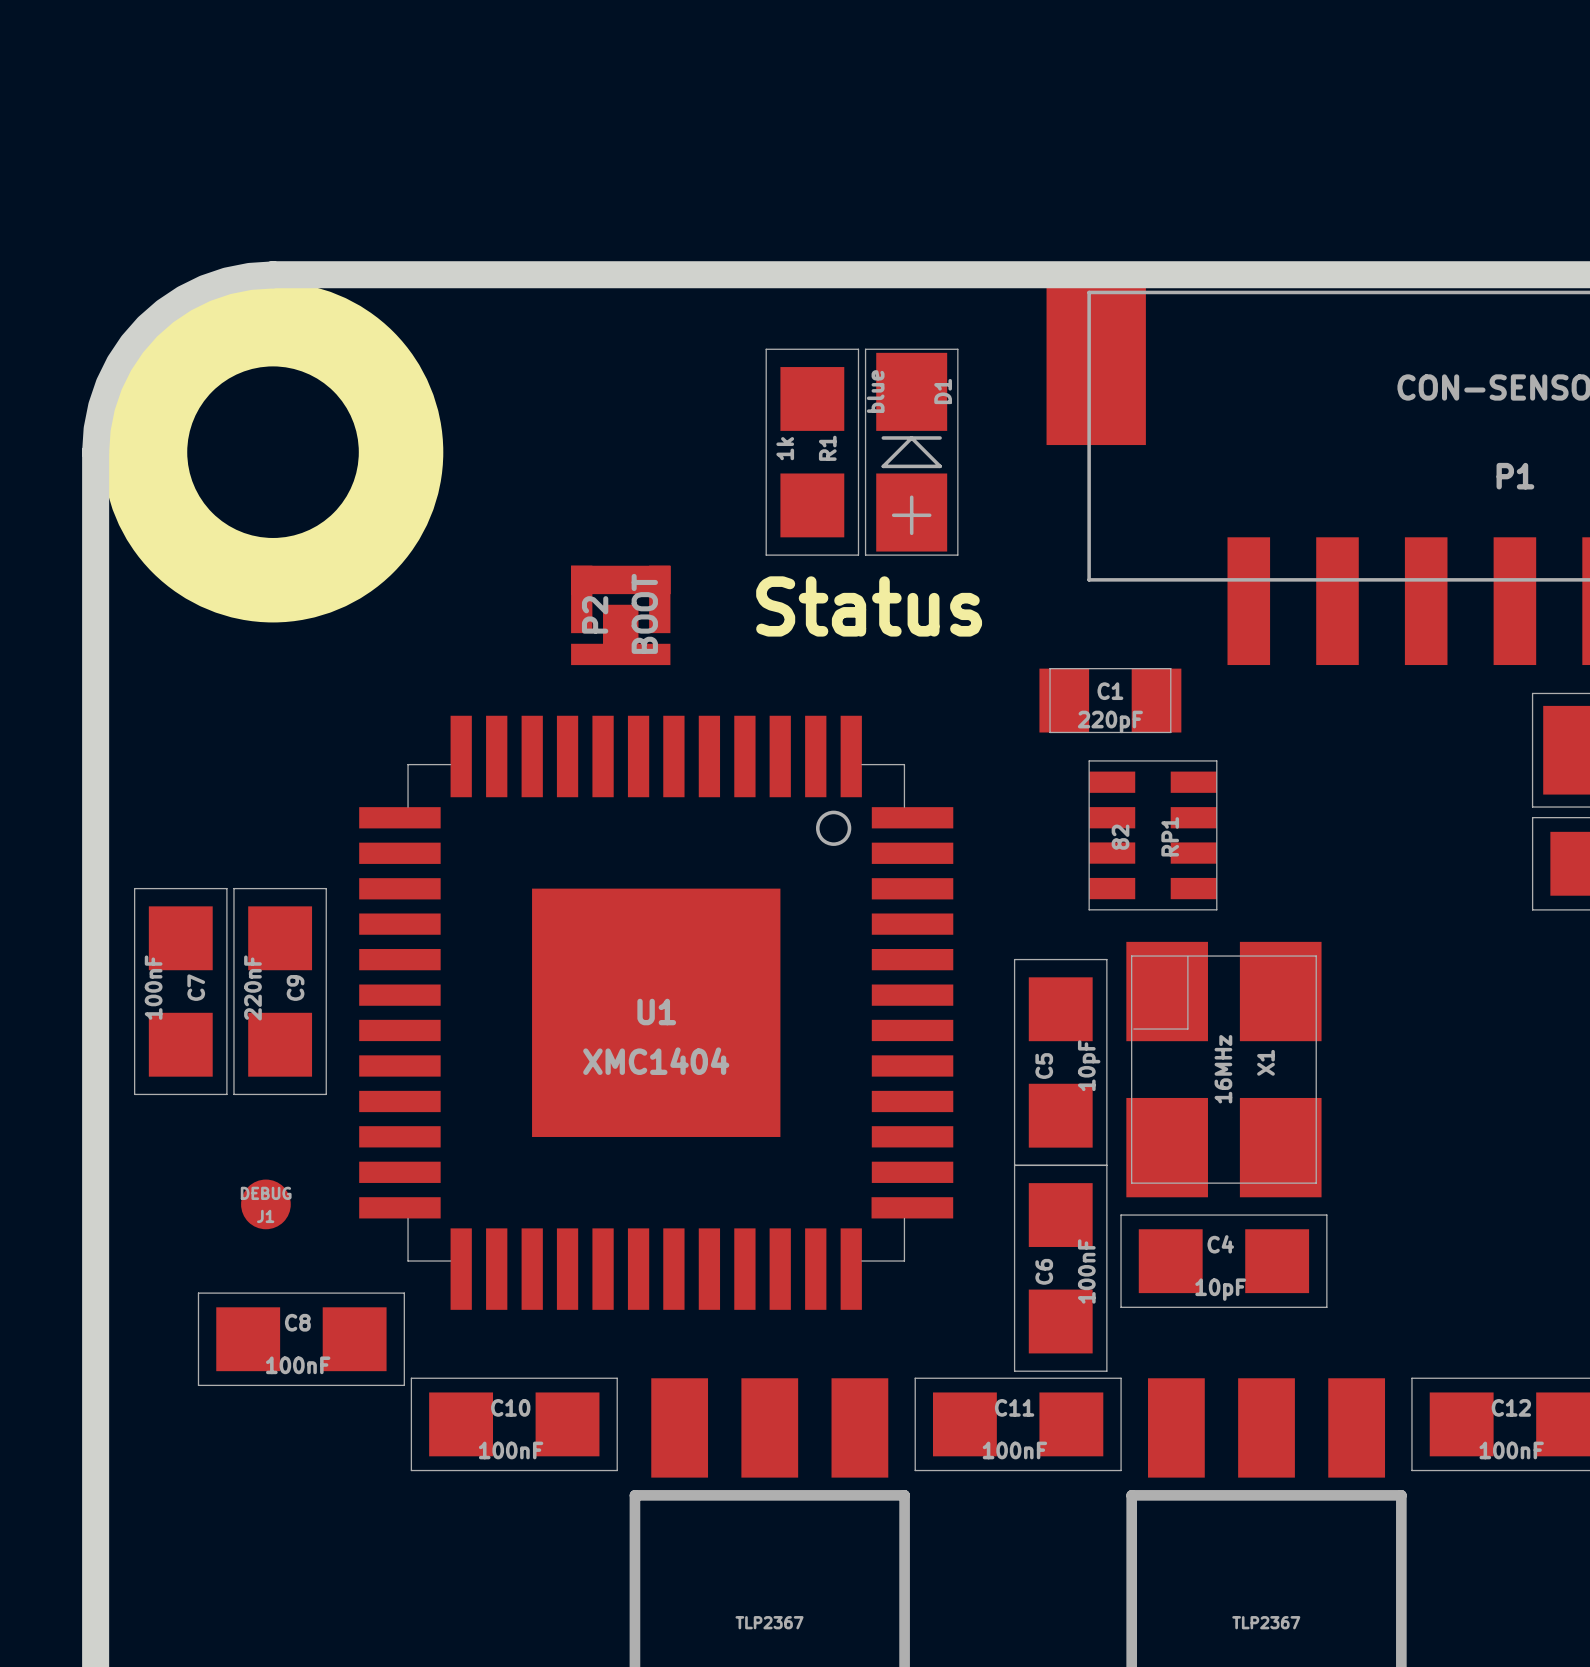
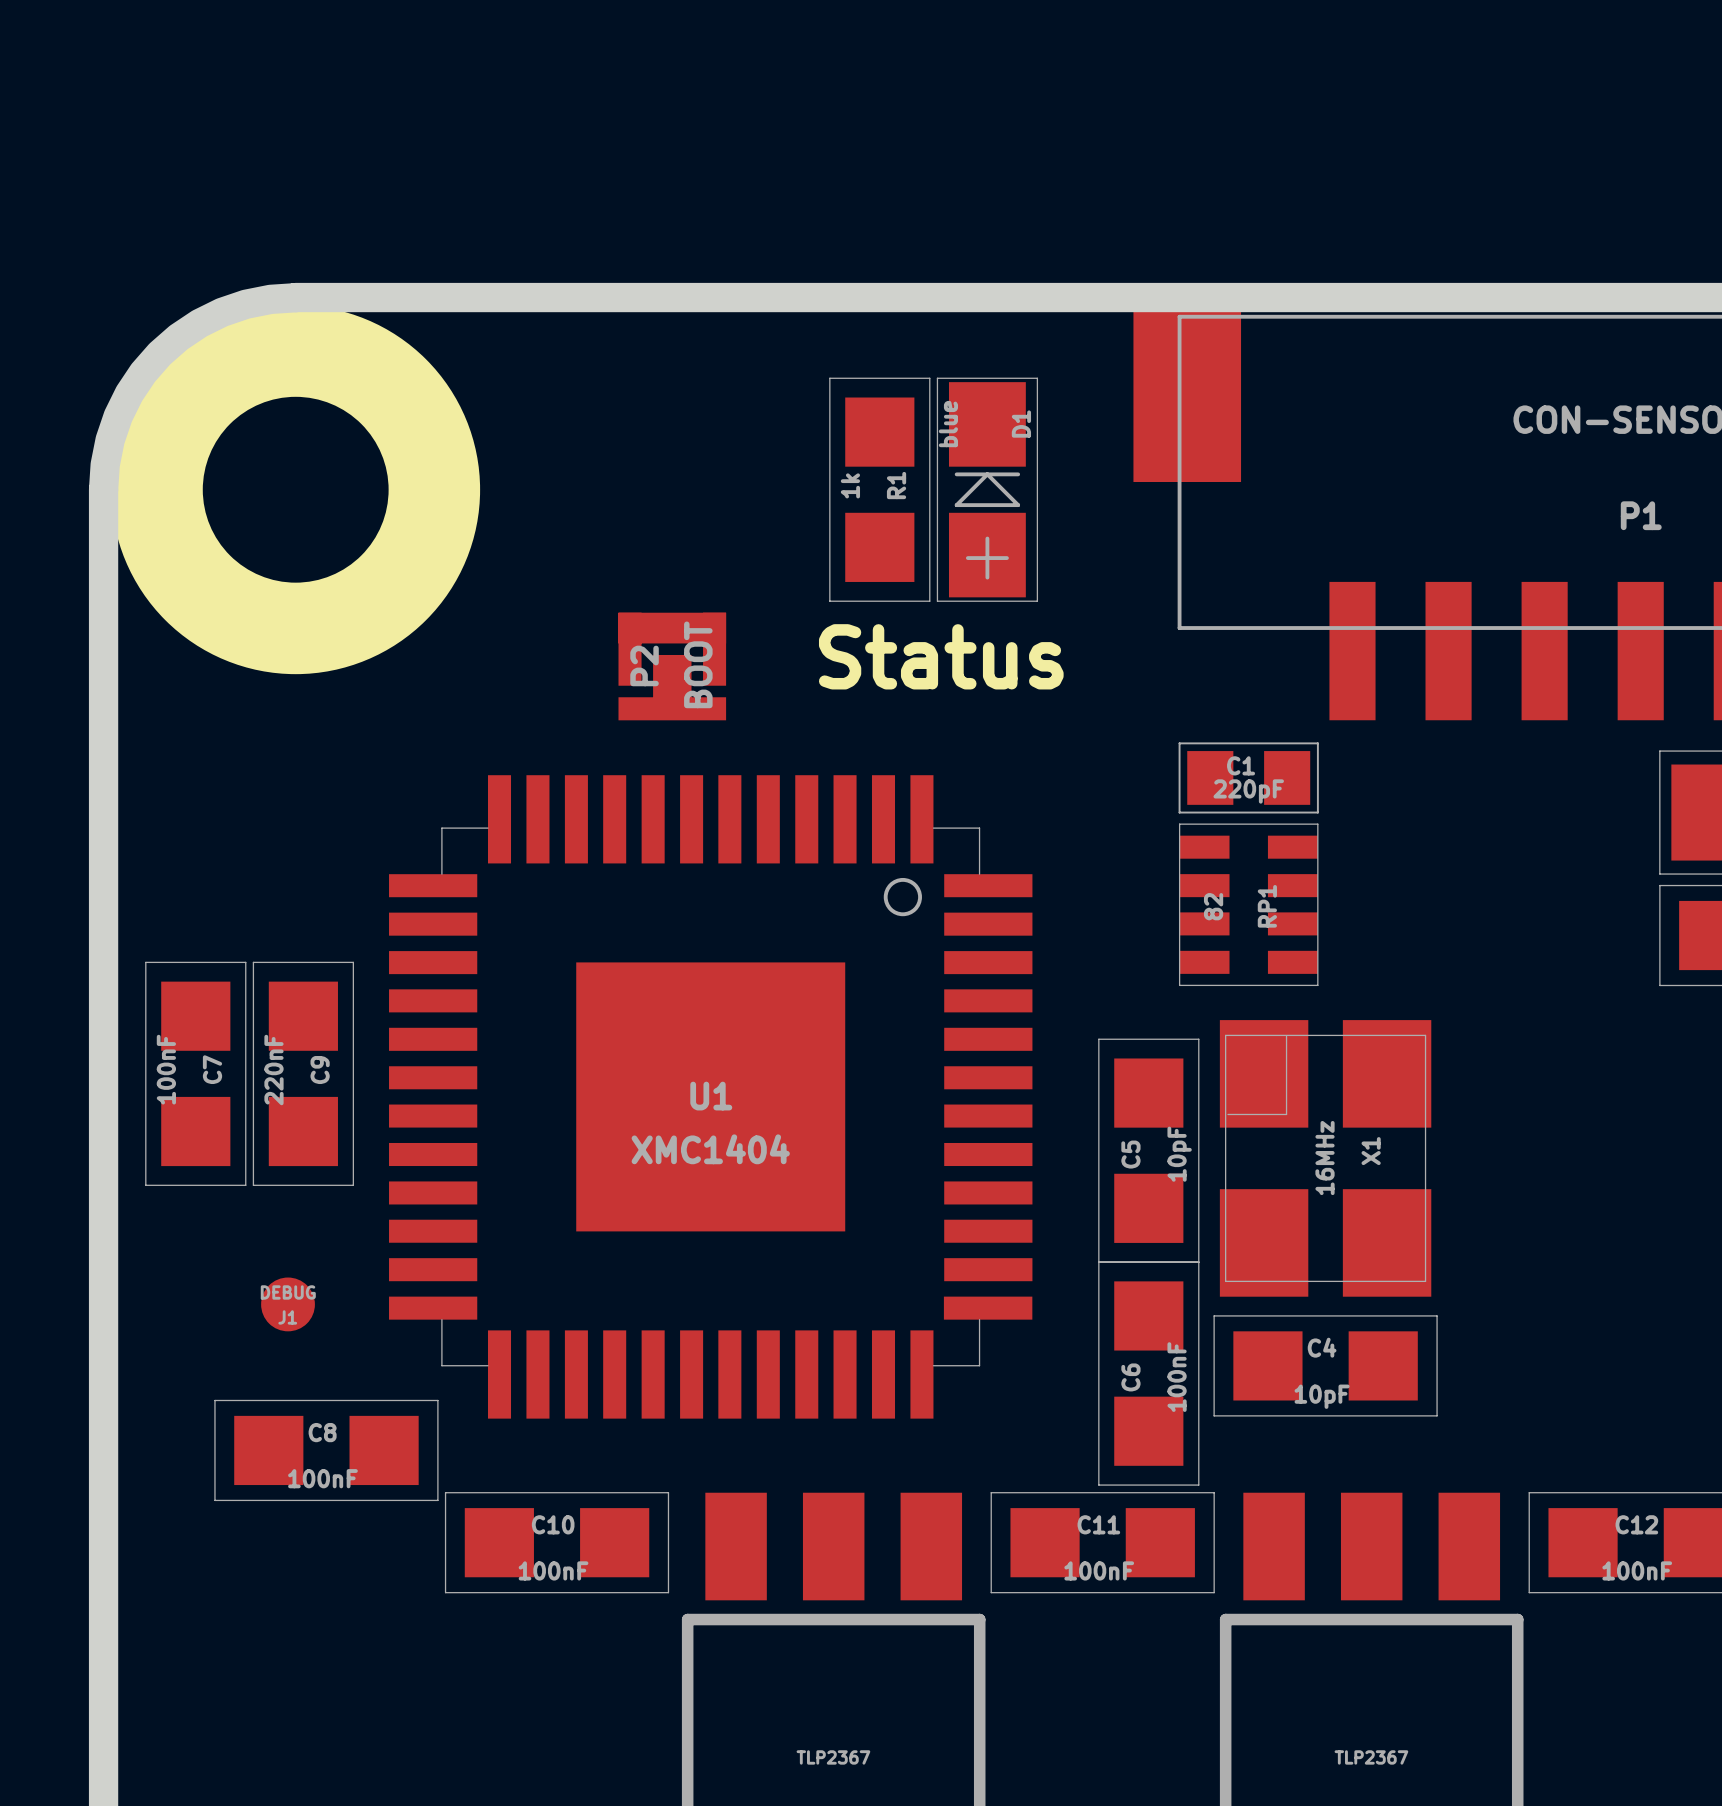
C1 footprint: [1039, 668, 1182, 733] -> [1178, 742, 1319, 814]
C1 name position: C1 (1110, 691) -> C1 (1241, 765)
C1 value position: 220pF (1110, 721) -> 220pF (1248, 791)

